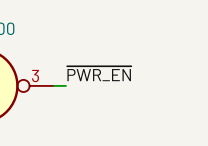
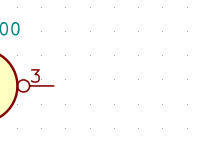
label: ~{PWR_EN} (99, 73) -> none
wire: (53, 85) (65, 85) -> none

